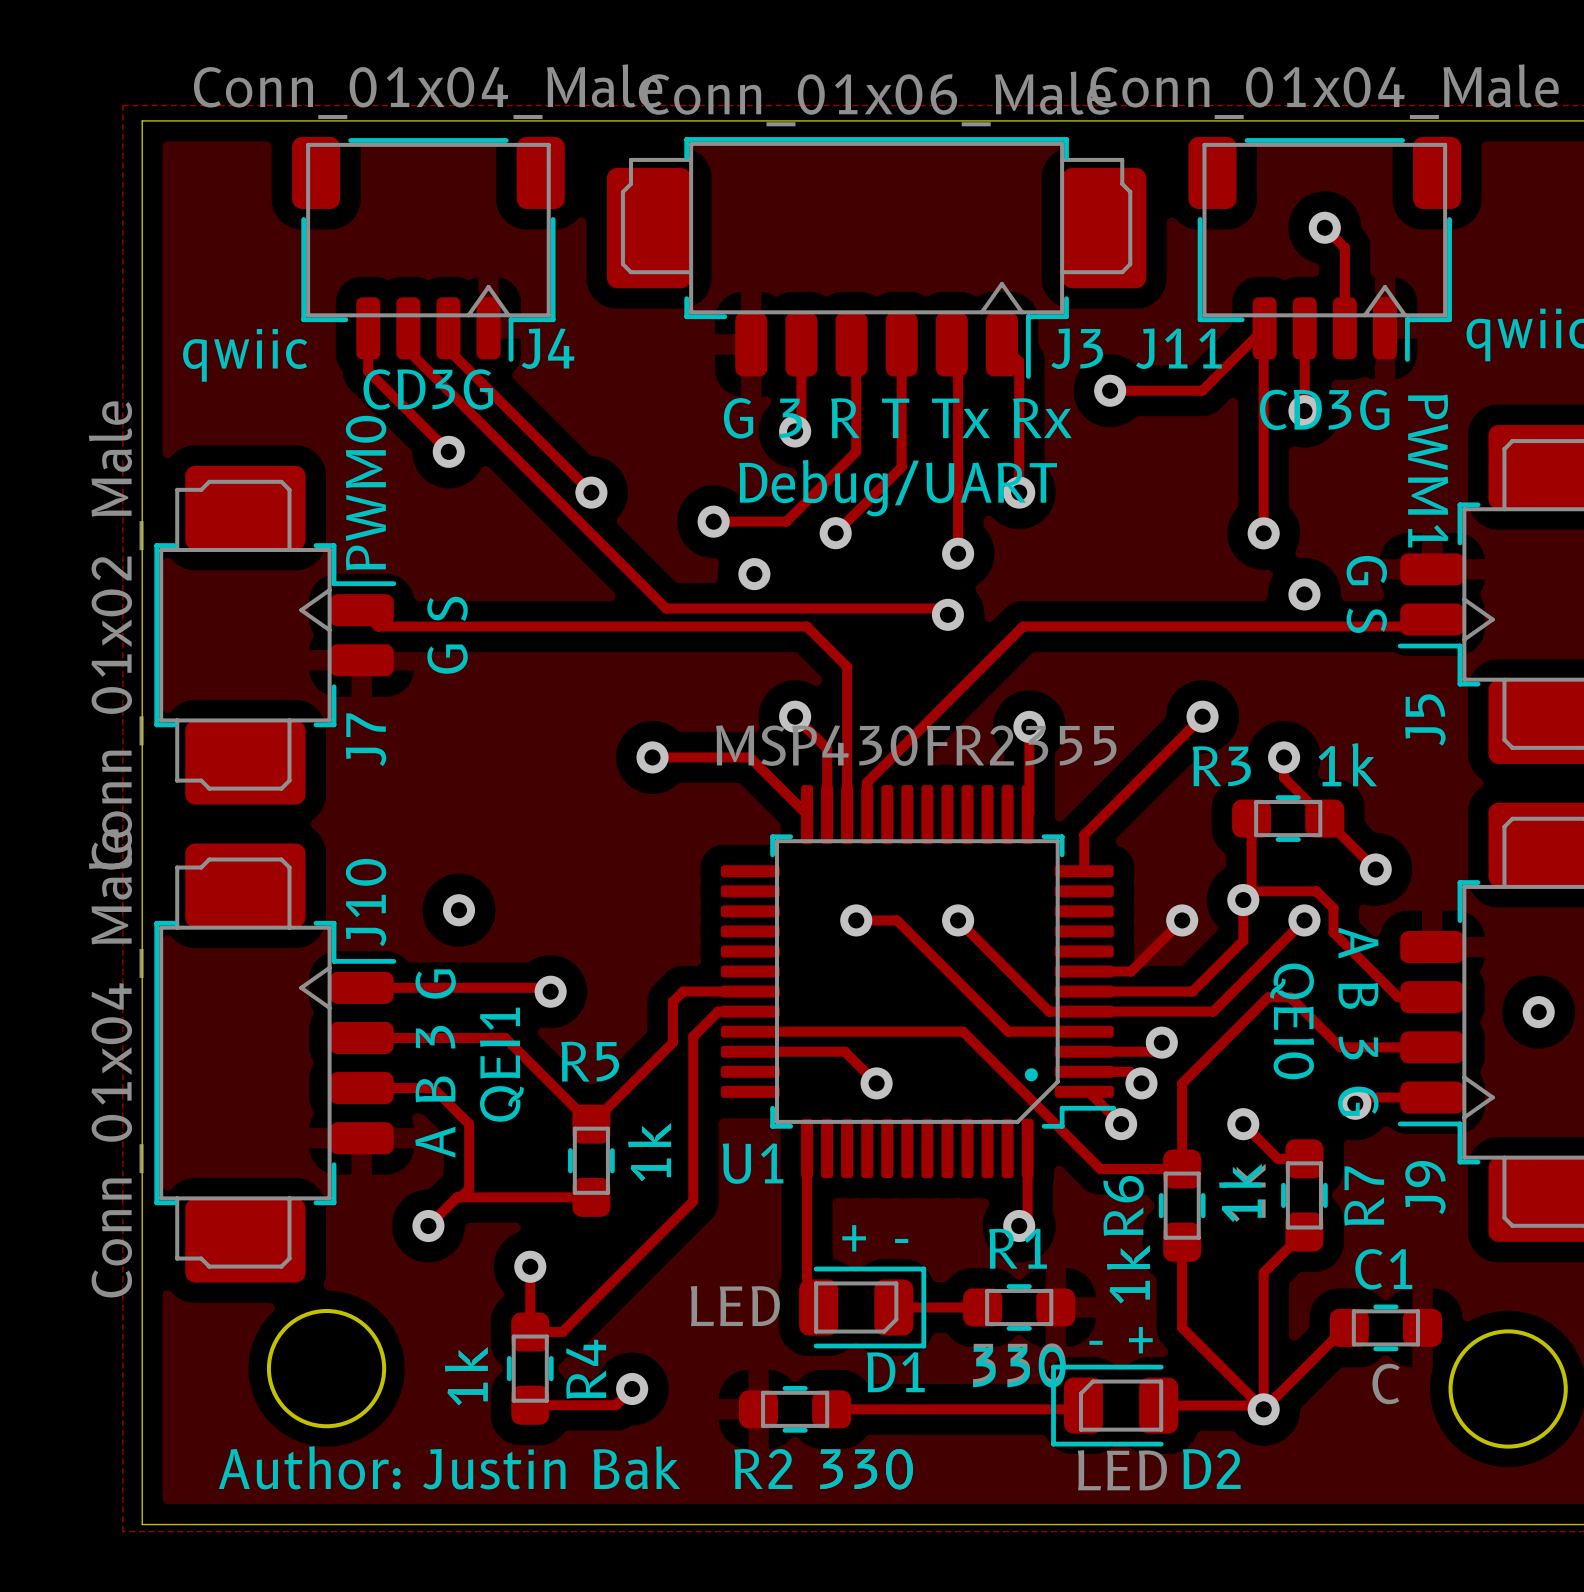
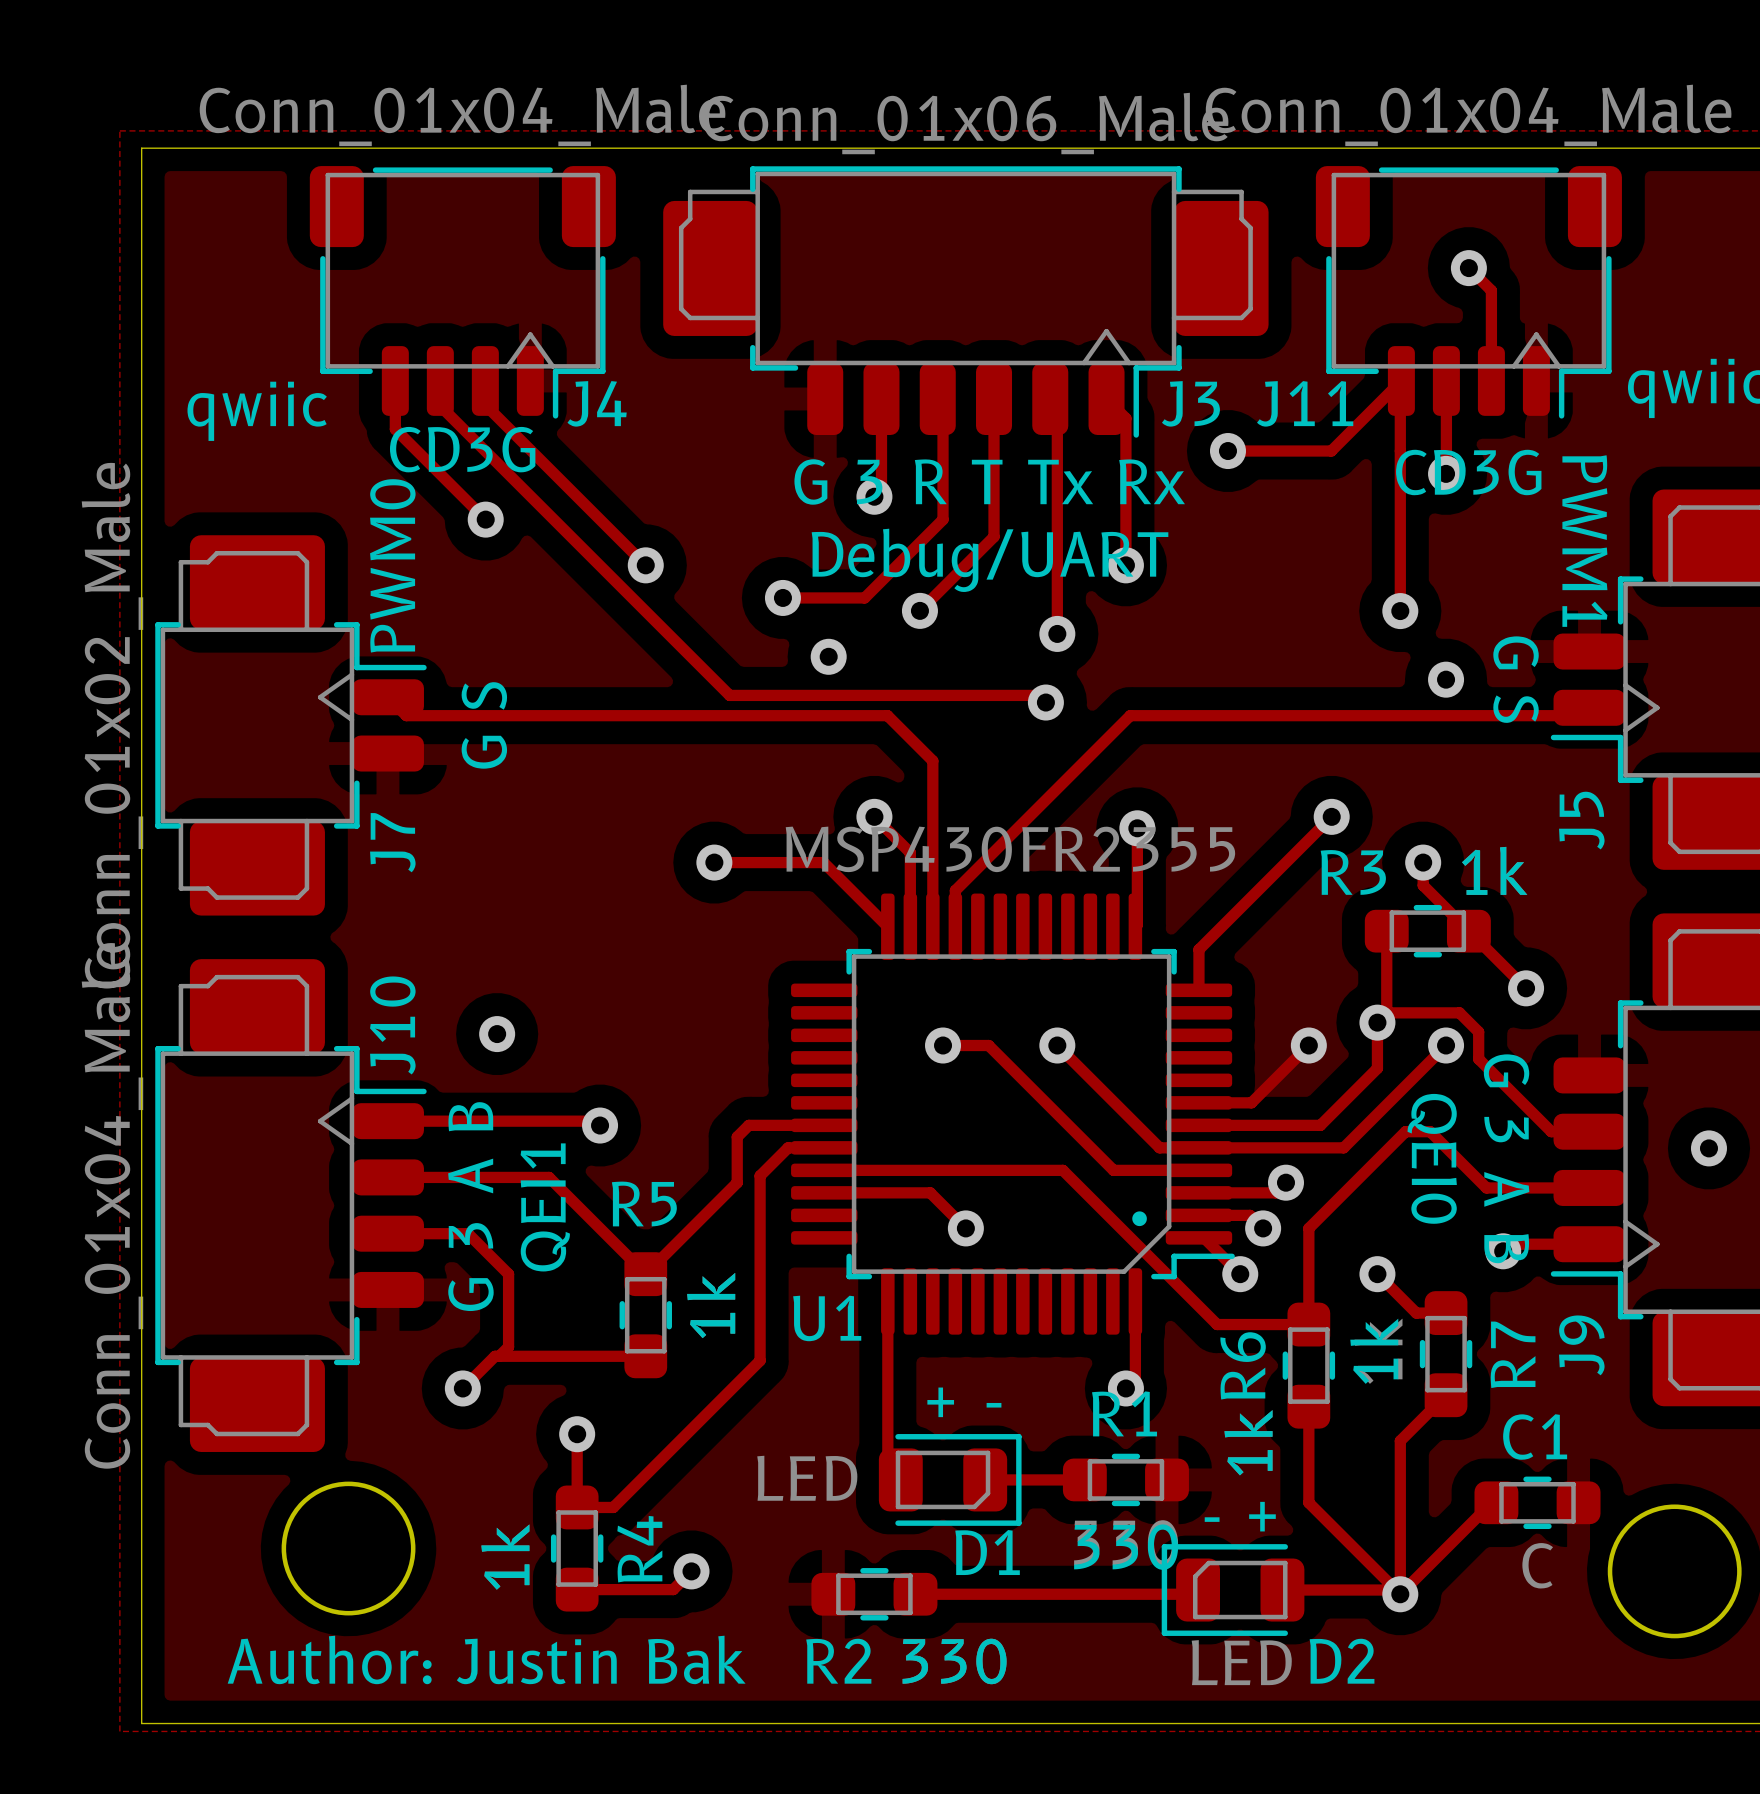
text: A B 3 G (1358, 1021) -> G 3 A B (1506, 1158)
text: A B 3 G (435, 1063) -> G 3 A B (470, 1206)

